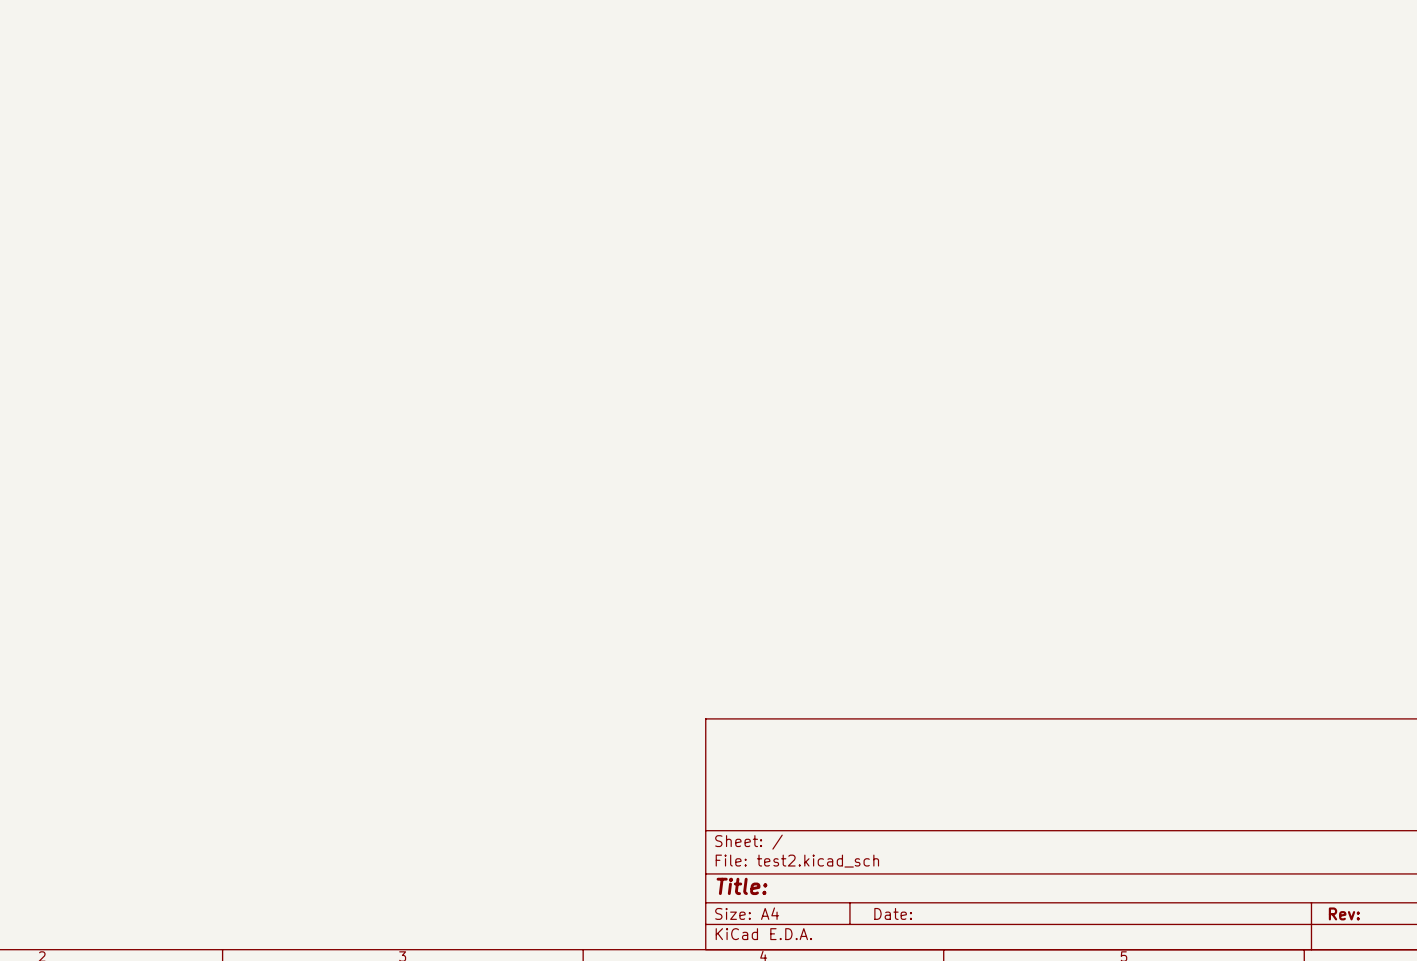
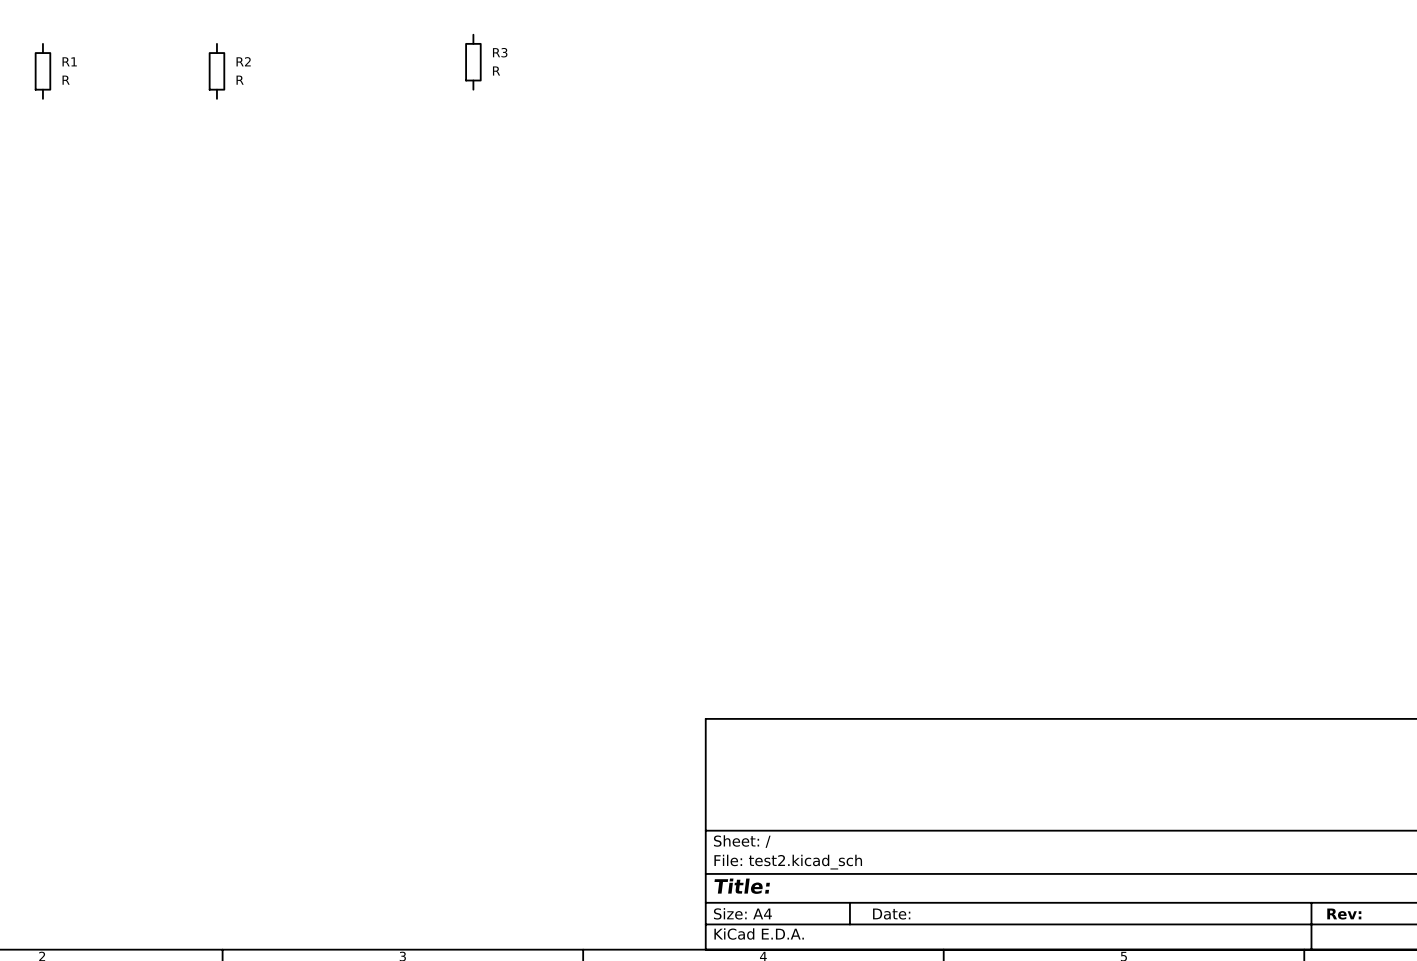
R3: none -> R (473, 62)
R1: none -> R (42, 71)
R2: none -> R (216, 71)

